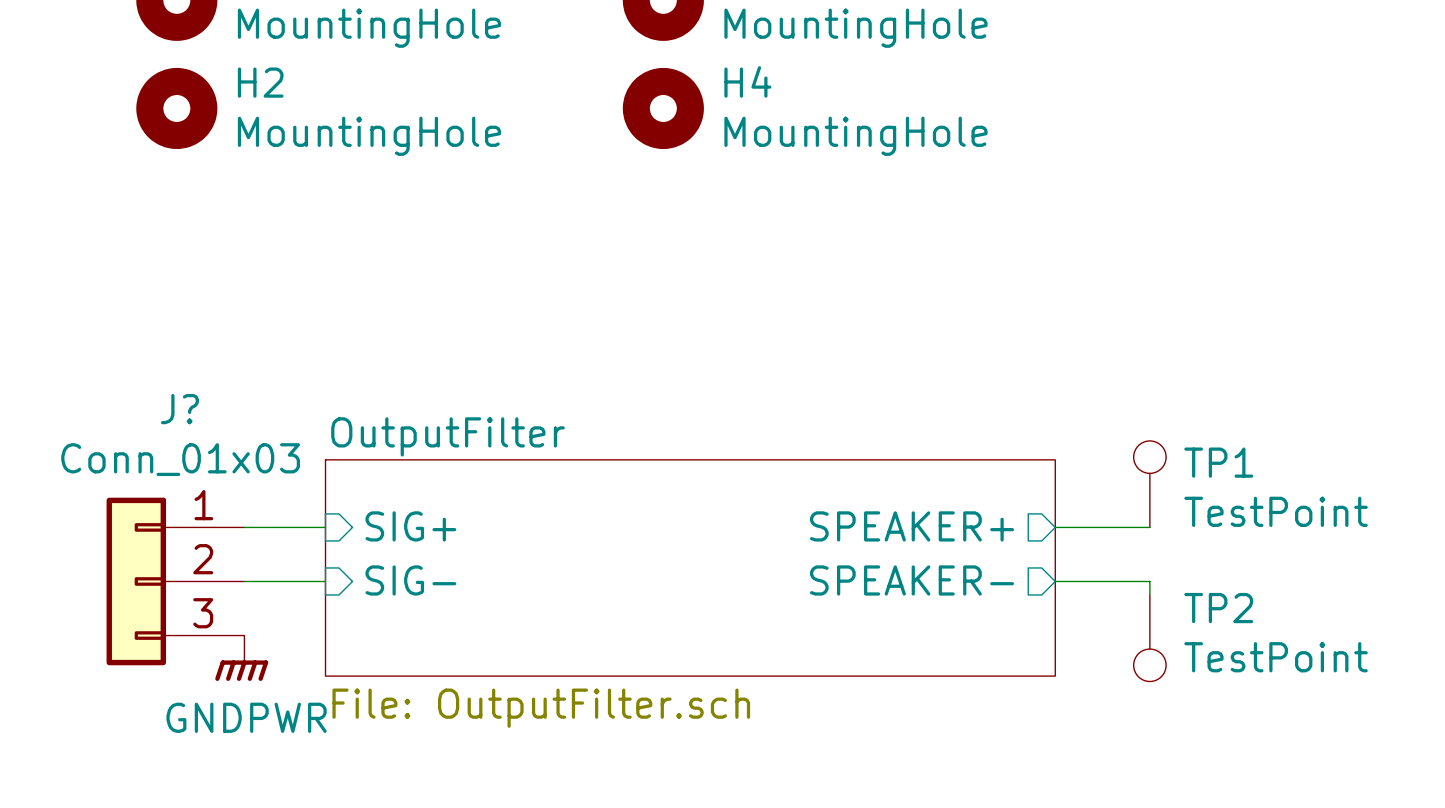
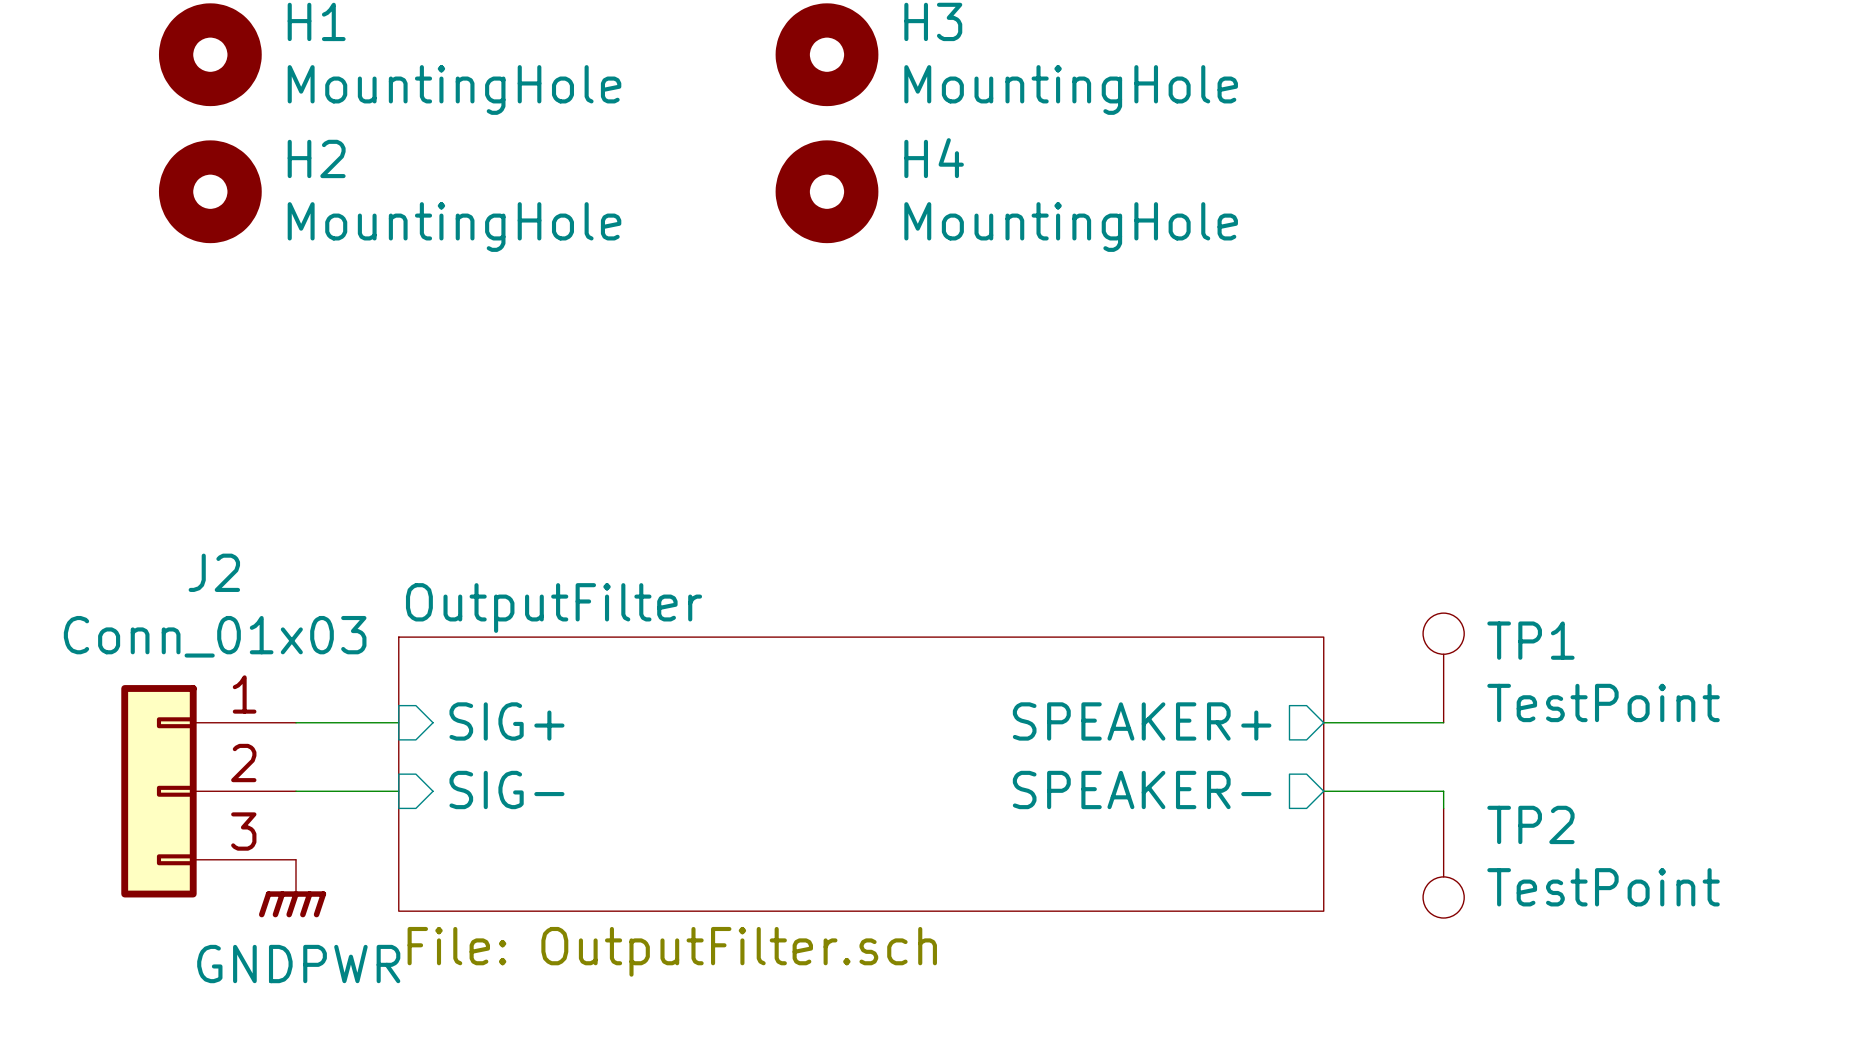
J? name: J? (179, 409) -> J2 (214, 572)

